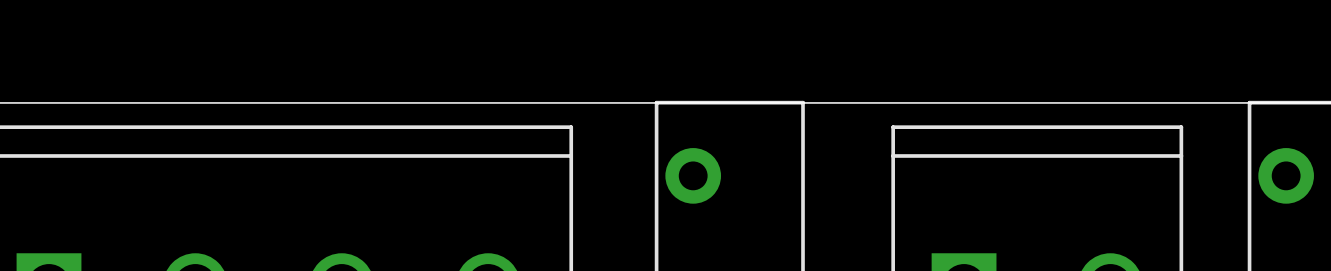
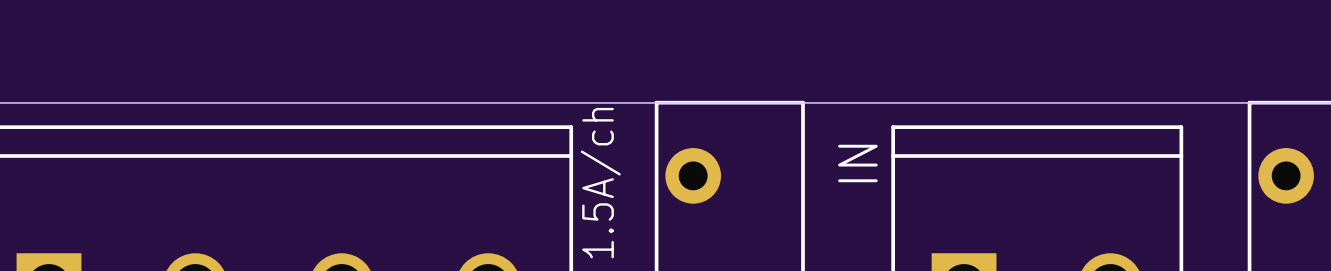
text: none -> IN (857, 163)
text: none -> 1.5A/ch (600, 183)

